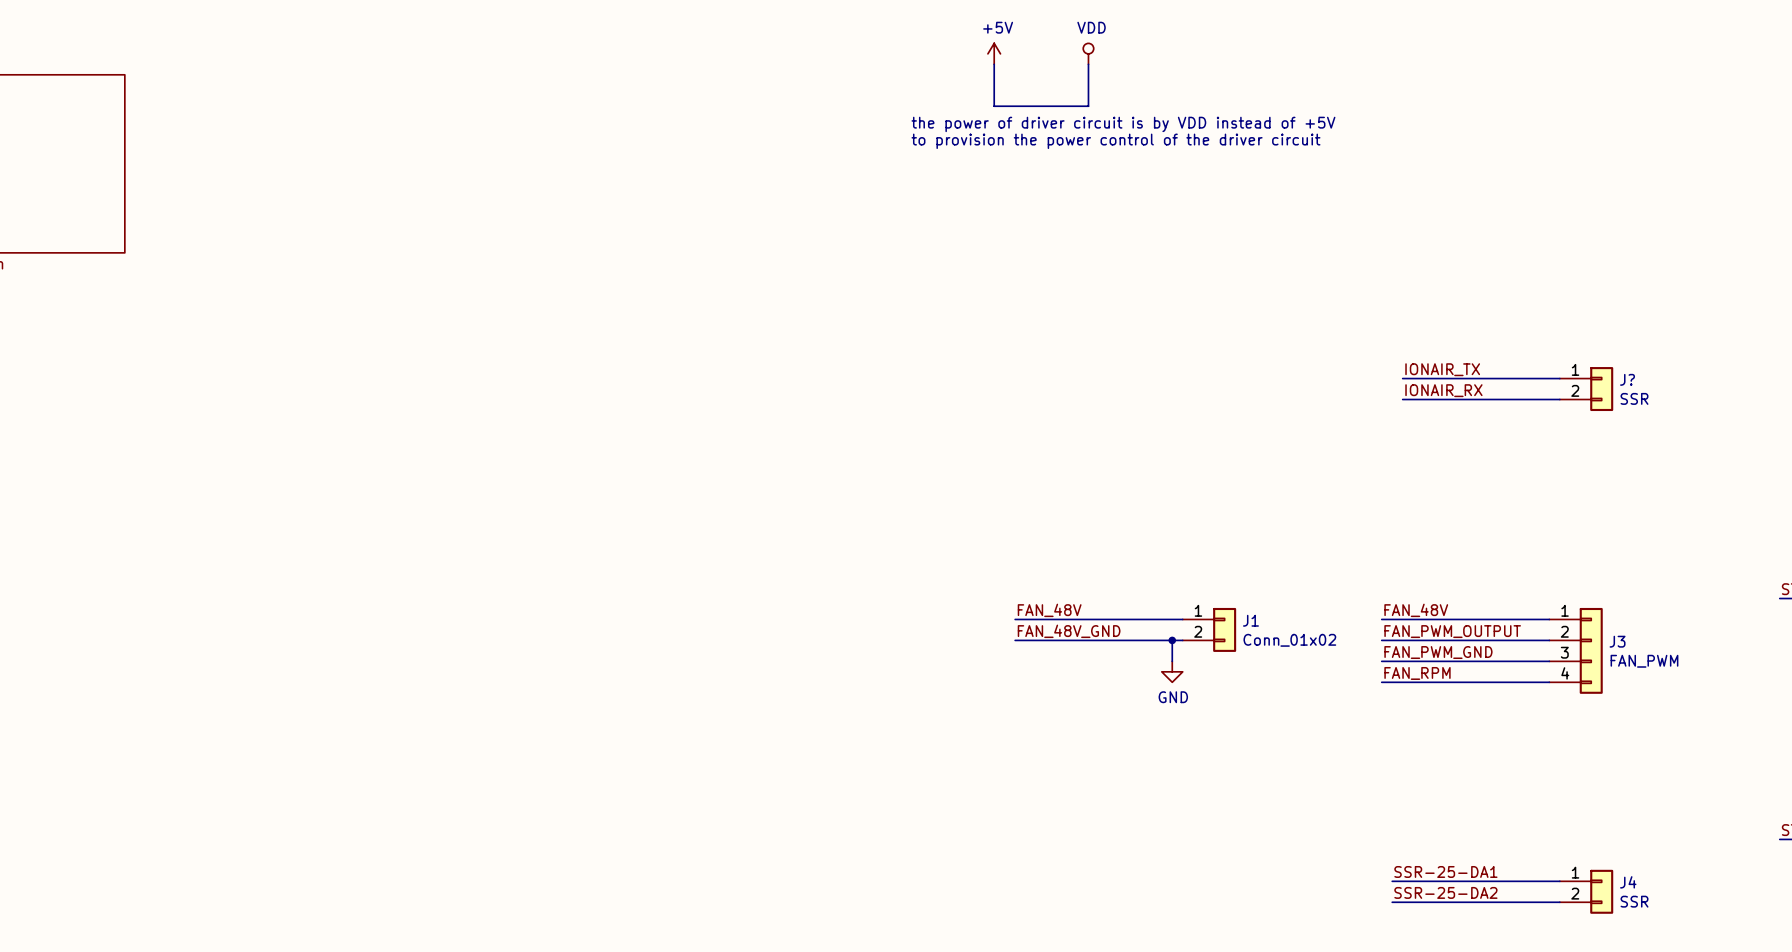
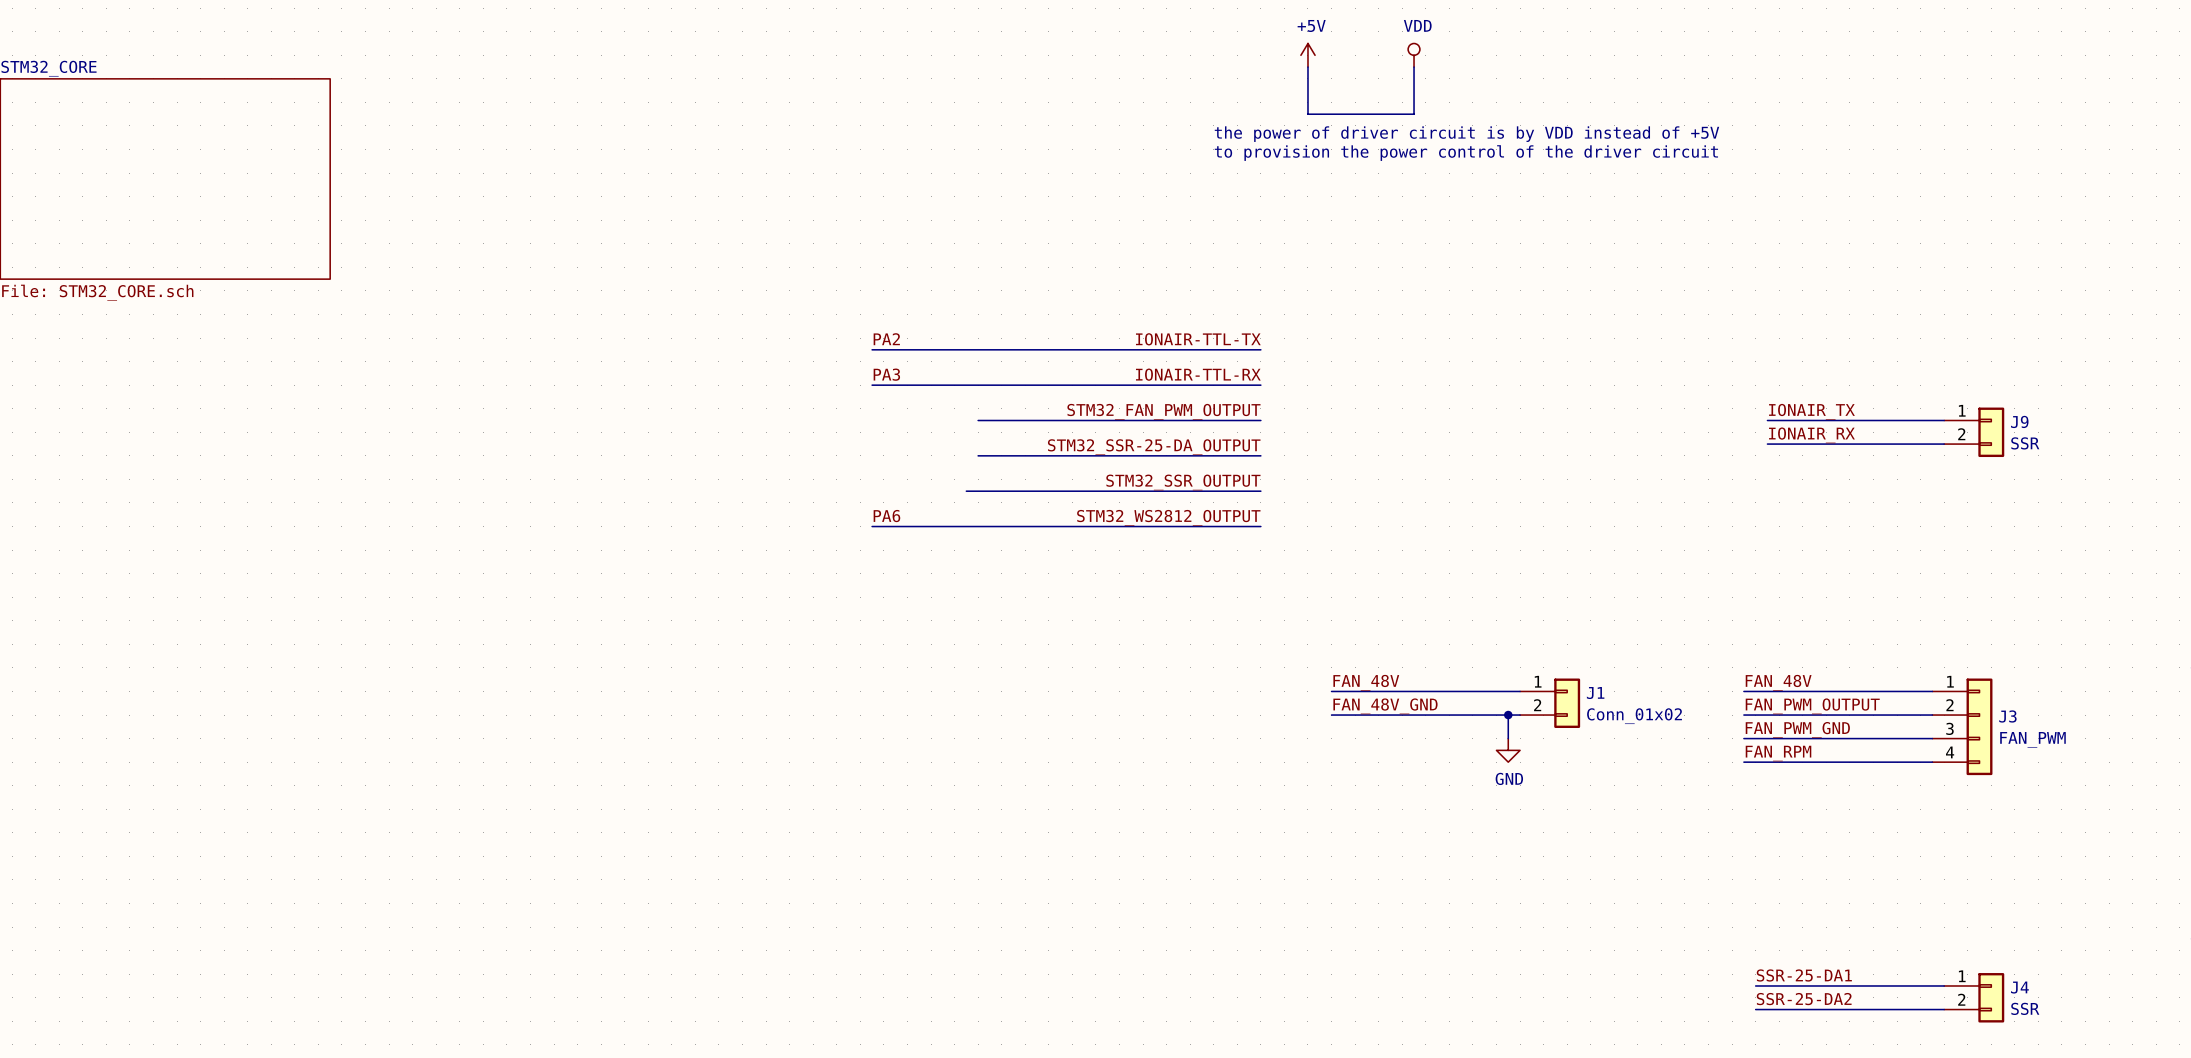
label: none -> PA2 (886, 339)
label: none -> IONAIR-TTL-TX (1198, 339)
wire: none -> (872, 349) (1260, 349)
label: none -> PA3 (886, 374)
label: none -> IONAIR-TTL-RX (1198, 374)
wire: none -> (872, 385) (1260, 385)
label: none -> STM32_FAN_PWM_OUTPUT (1163, 411)
wire: none -> (978, 420) (1260, 420)
J? name: J? (1627, 379) -> J9 (2019, 421)
label: none -> STM32_SSR-25-DA_OUTPUT (1154, 447)
wire: none -> (978, 455) (1260, 455)
label: none -> STM32_SSR_OUTPUT (1183, 482)
wire: none -> (966, 491) (1260, 491)
label: none -> PA6 (886, 516)
label: none -> STM32_WS2812_OUTPUT (1168, 517)
wire: none -> (872, 526) (1260, 526)

